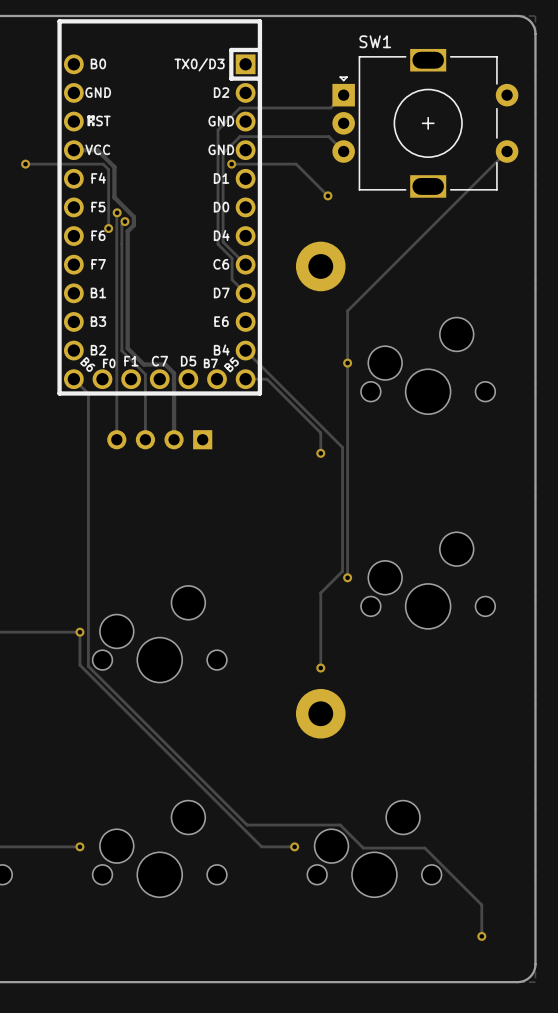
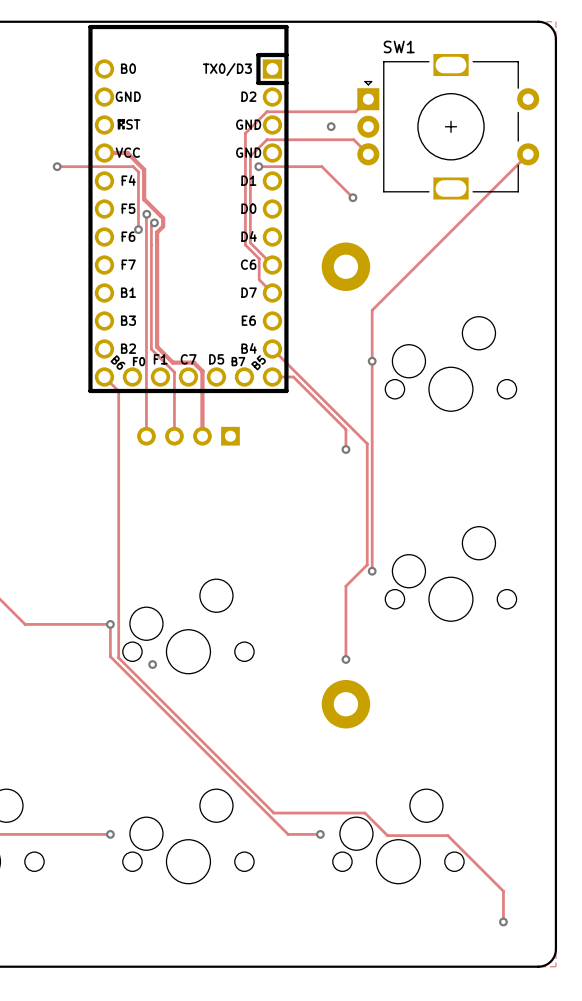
via: none -> (331, 126)
via: none -> (152, 664)

